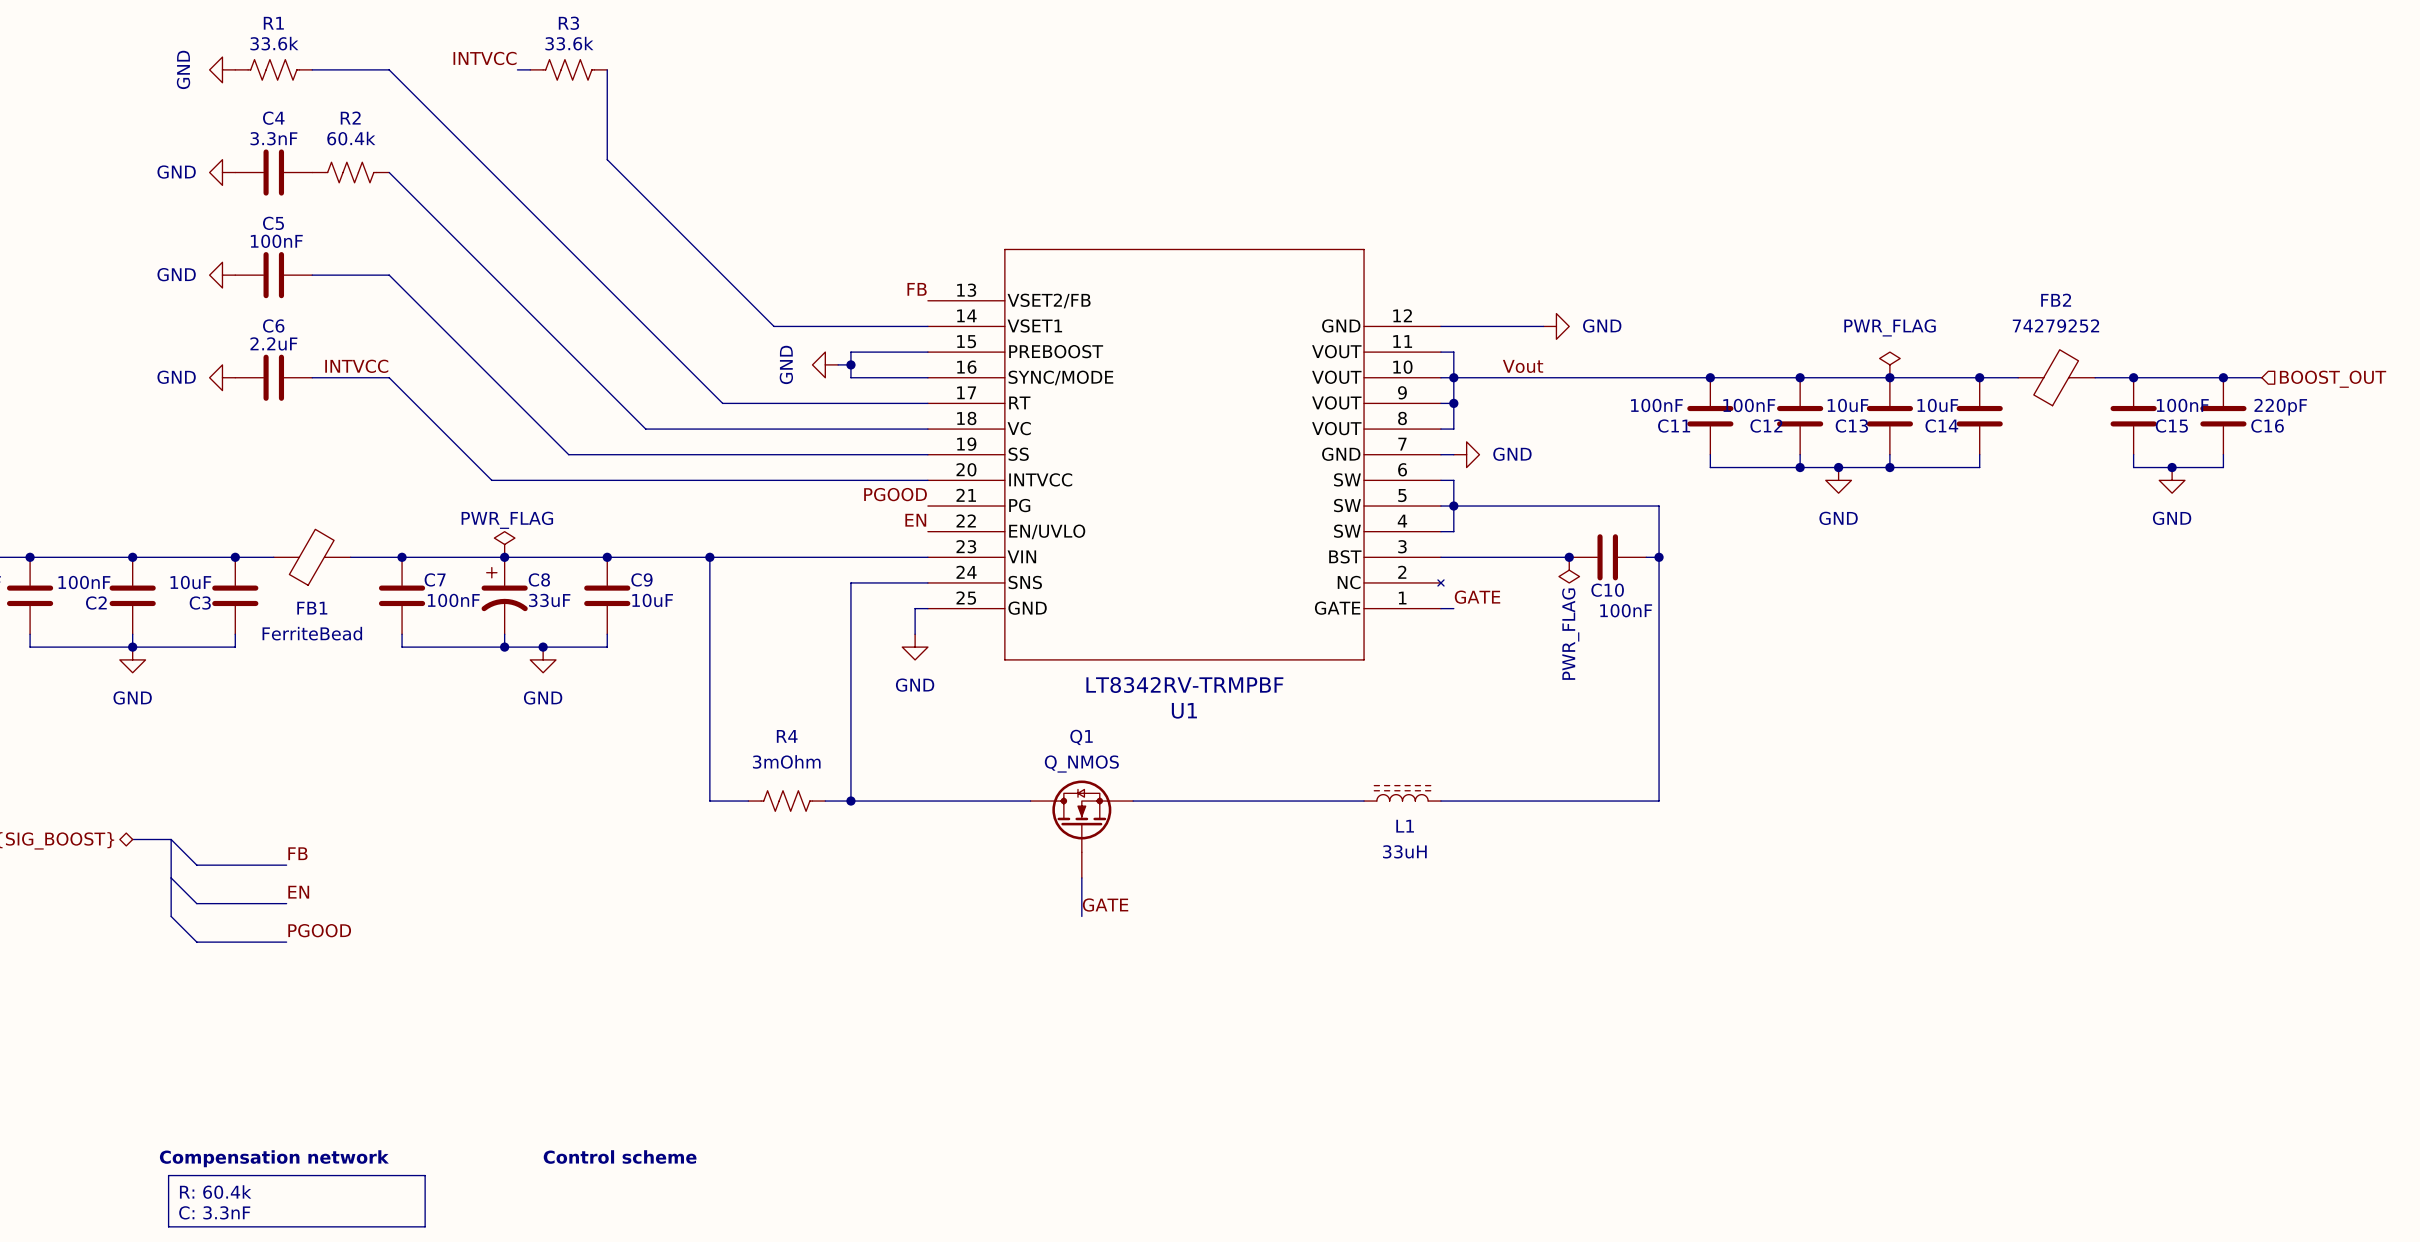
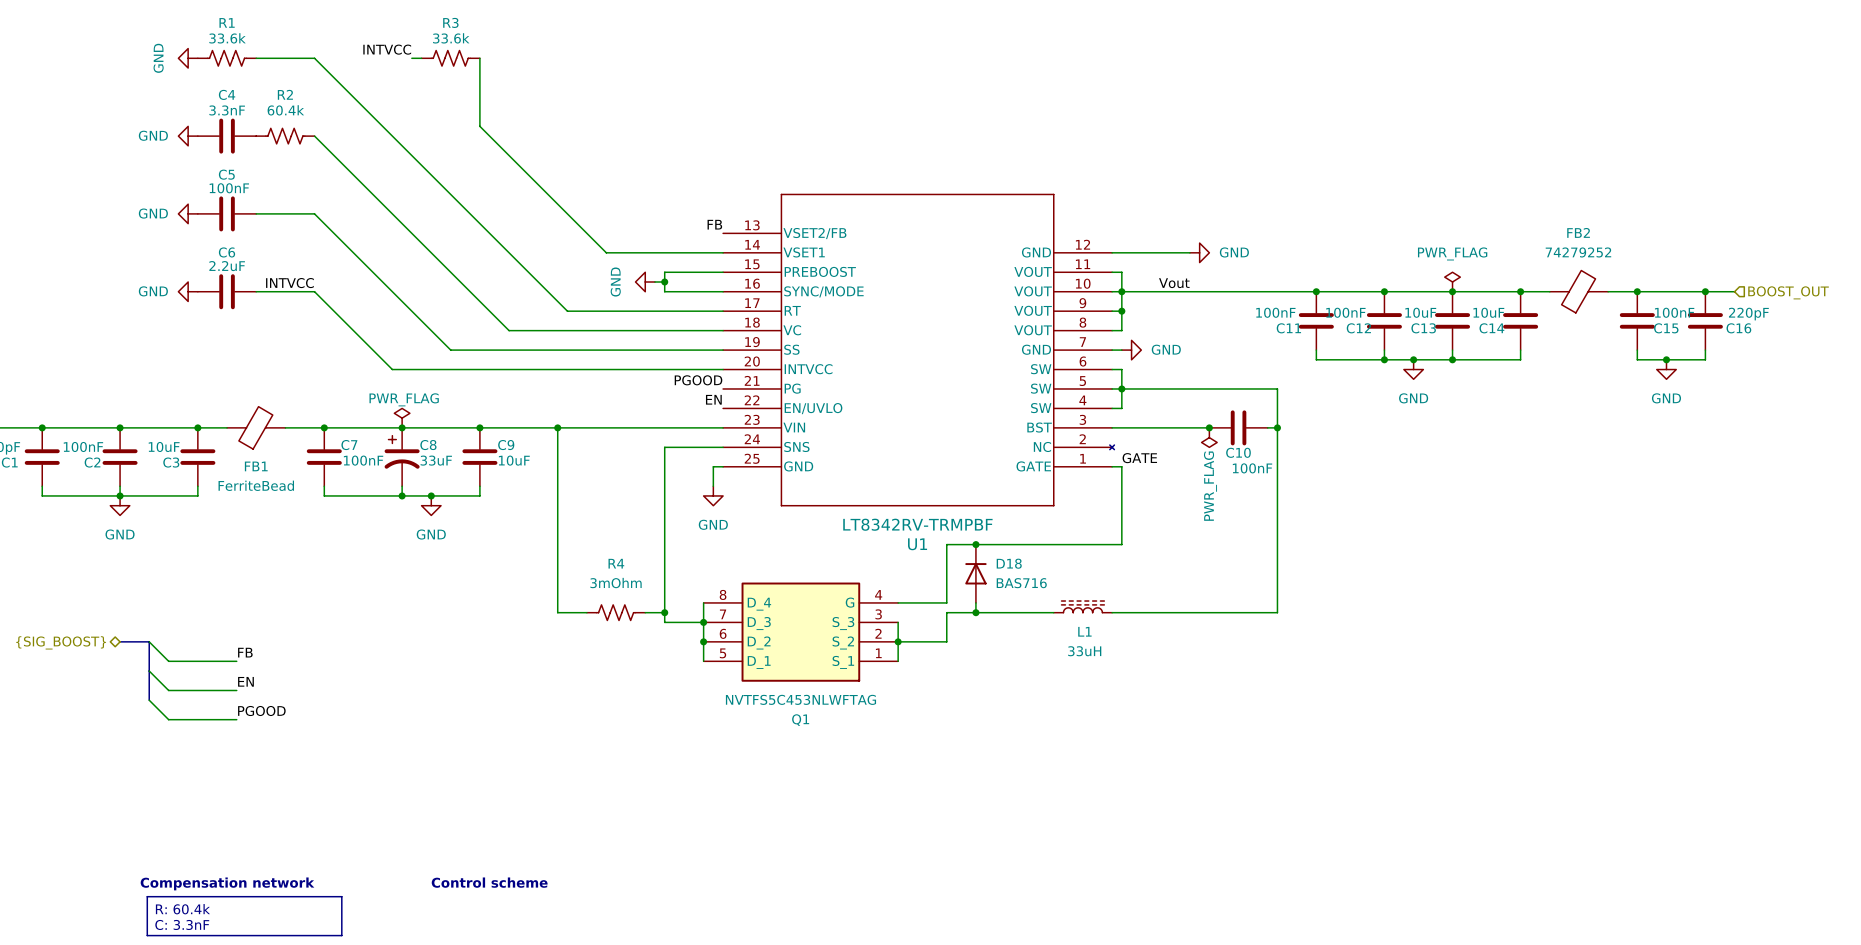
wire: none -> (1121, 466) (1121, 544) (946, 544) (946, 602) (898, 602)
junction: none -> (975, 544)
Q1 name position: Q1 (1081, 737) -> Q1 (800, 720)
D18: none -> BAS716 (975, 573)
Q1 value: Q_NMOS (1081, 764) -> NVTFS5C453NLWFTAG (800, 699)
Q1 symbol: [1030, 780, 1134, 878] -> [703, 582, 899, 682]
wire: none -> (703, 602) (703, 661)
wire: none -> (975, 602) (975, 612)
wire: (850, 801) (1030, 801) -> (664, 612) (664, 622) (703, 622)
wire: (1133, 801) (1222, 801) -> (898, 641) (946, 641) (946, 612)
junction: none -> (975, 612)
junction: none -> (703, 622)
wire: none -> (898, 622) (898, 661)
junction: none -> (703, 641)
junction: none -> (898, 641)
wire: (1081, 877) (1081, 916) -> none
label: GATE (1105, 905) -> none

